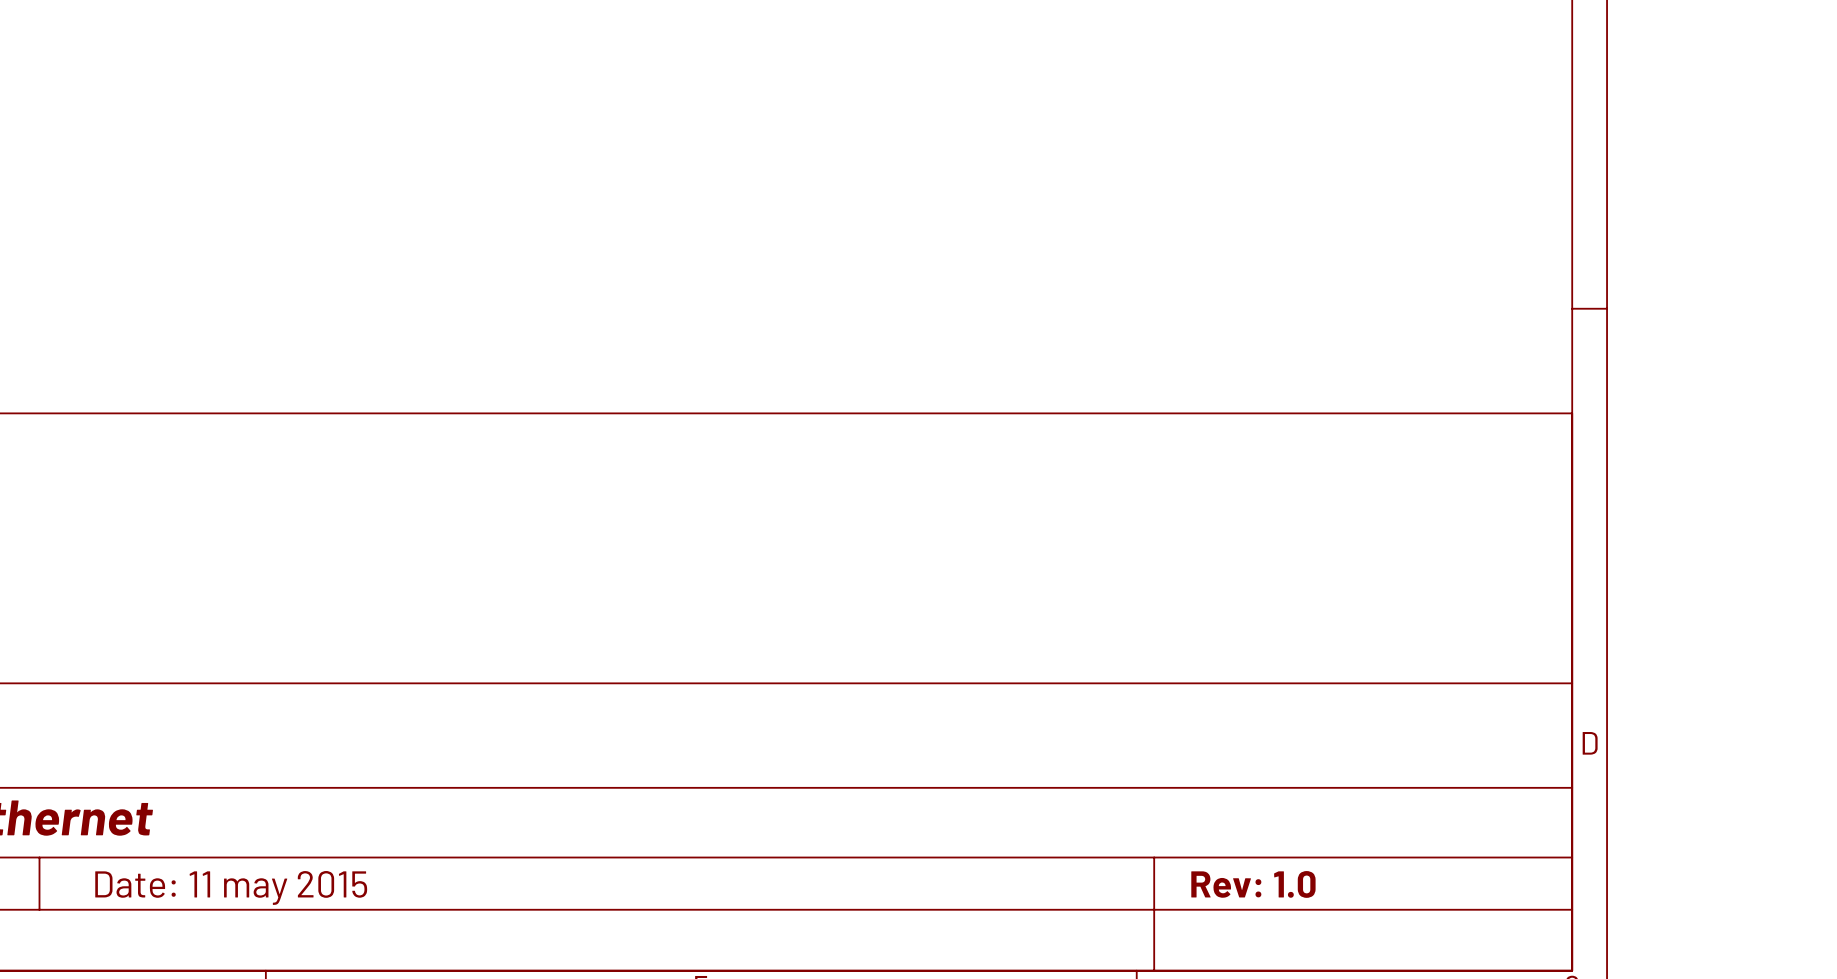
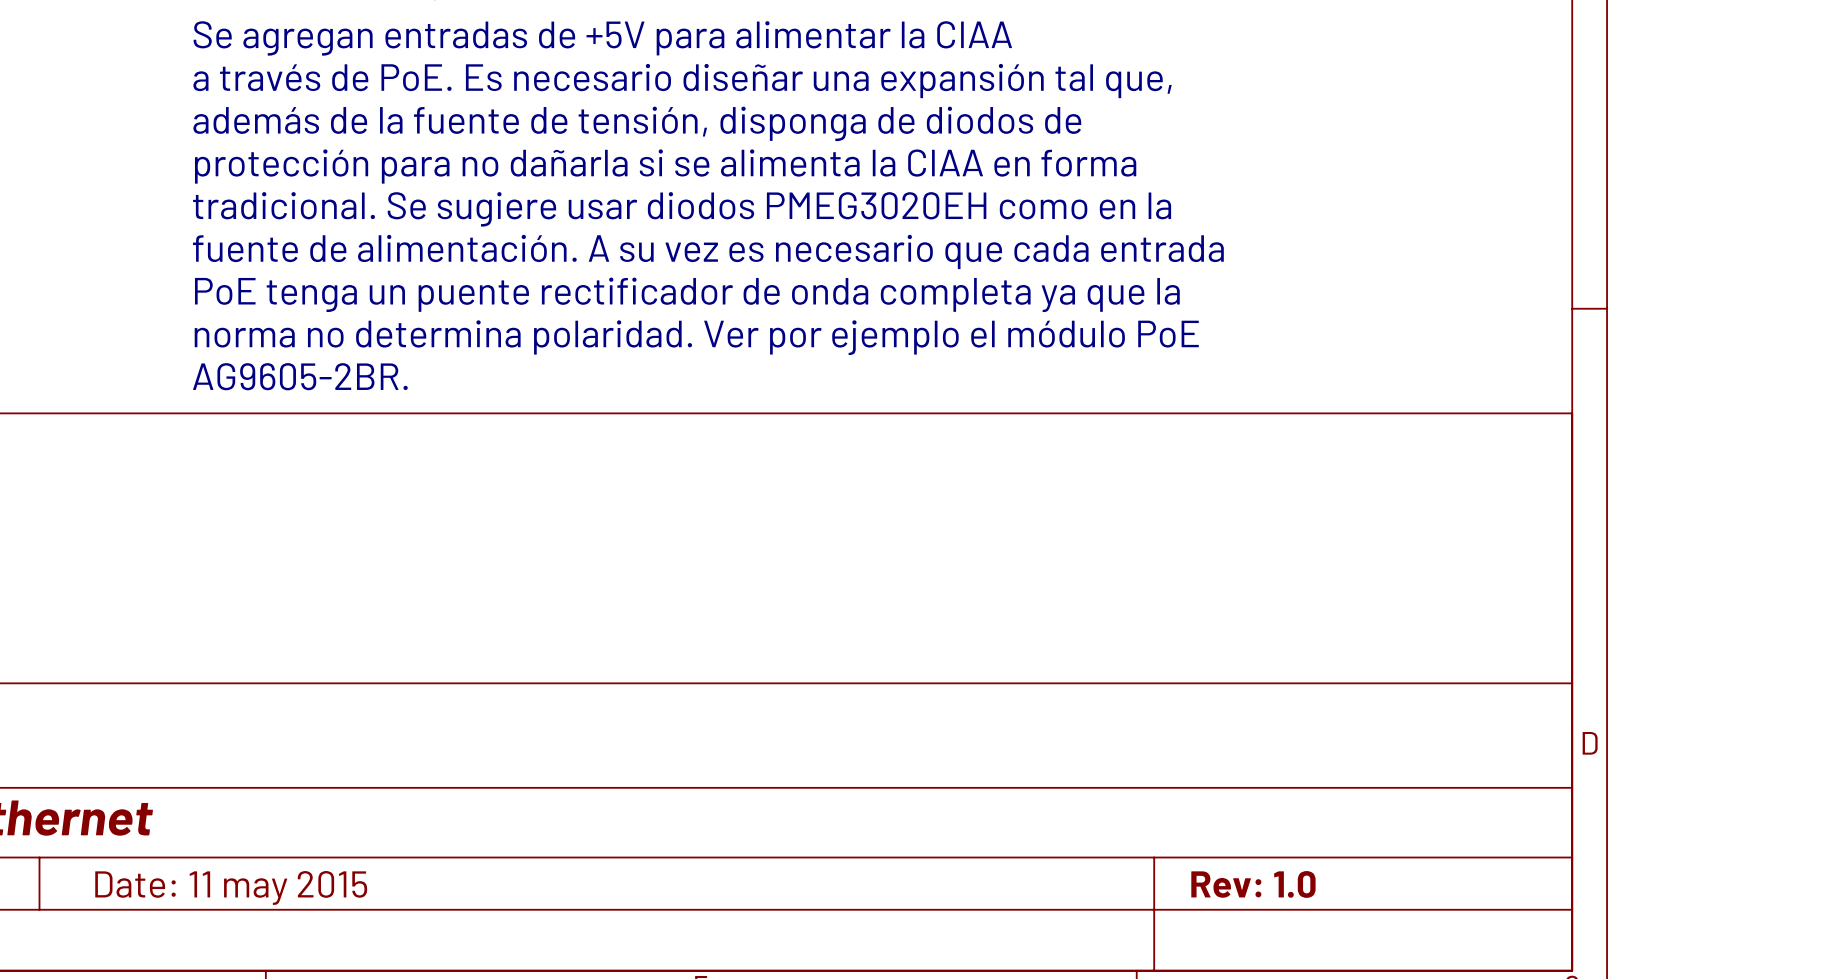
text: none -> Se agregan entradas de +5V para alimentar la CIAA (602, 38)
text: none -> a través de PoE. Es necesario diseñar una expansión tal que, (682, 81)
text: none -> además de la fuente de tensión, disponga de diodos de (637, 123)
text: none -> protección para no dañarla si se alimenta la CIAA en forma (665, 166)
text: none -> tradicional. Se sugiere usar diodos PMEG3020EH como en la (682, 209)
text: none -> fuente de alimentación. A su vez es necesario que cada entrada (708, 251)
text: none -> PoE tenga un puente rectificador de onda completa ya que la (687, 294)
text: none -> norma no determina polaridad. Ver por ejemplo el módulo PoE (696, 337)
text: none -> AG9605-2BR. (300, 376)

